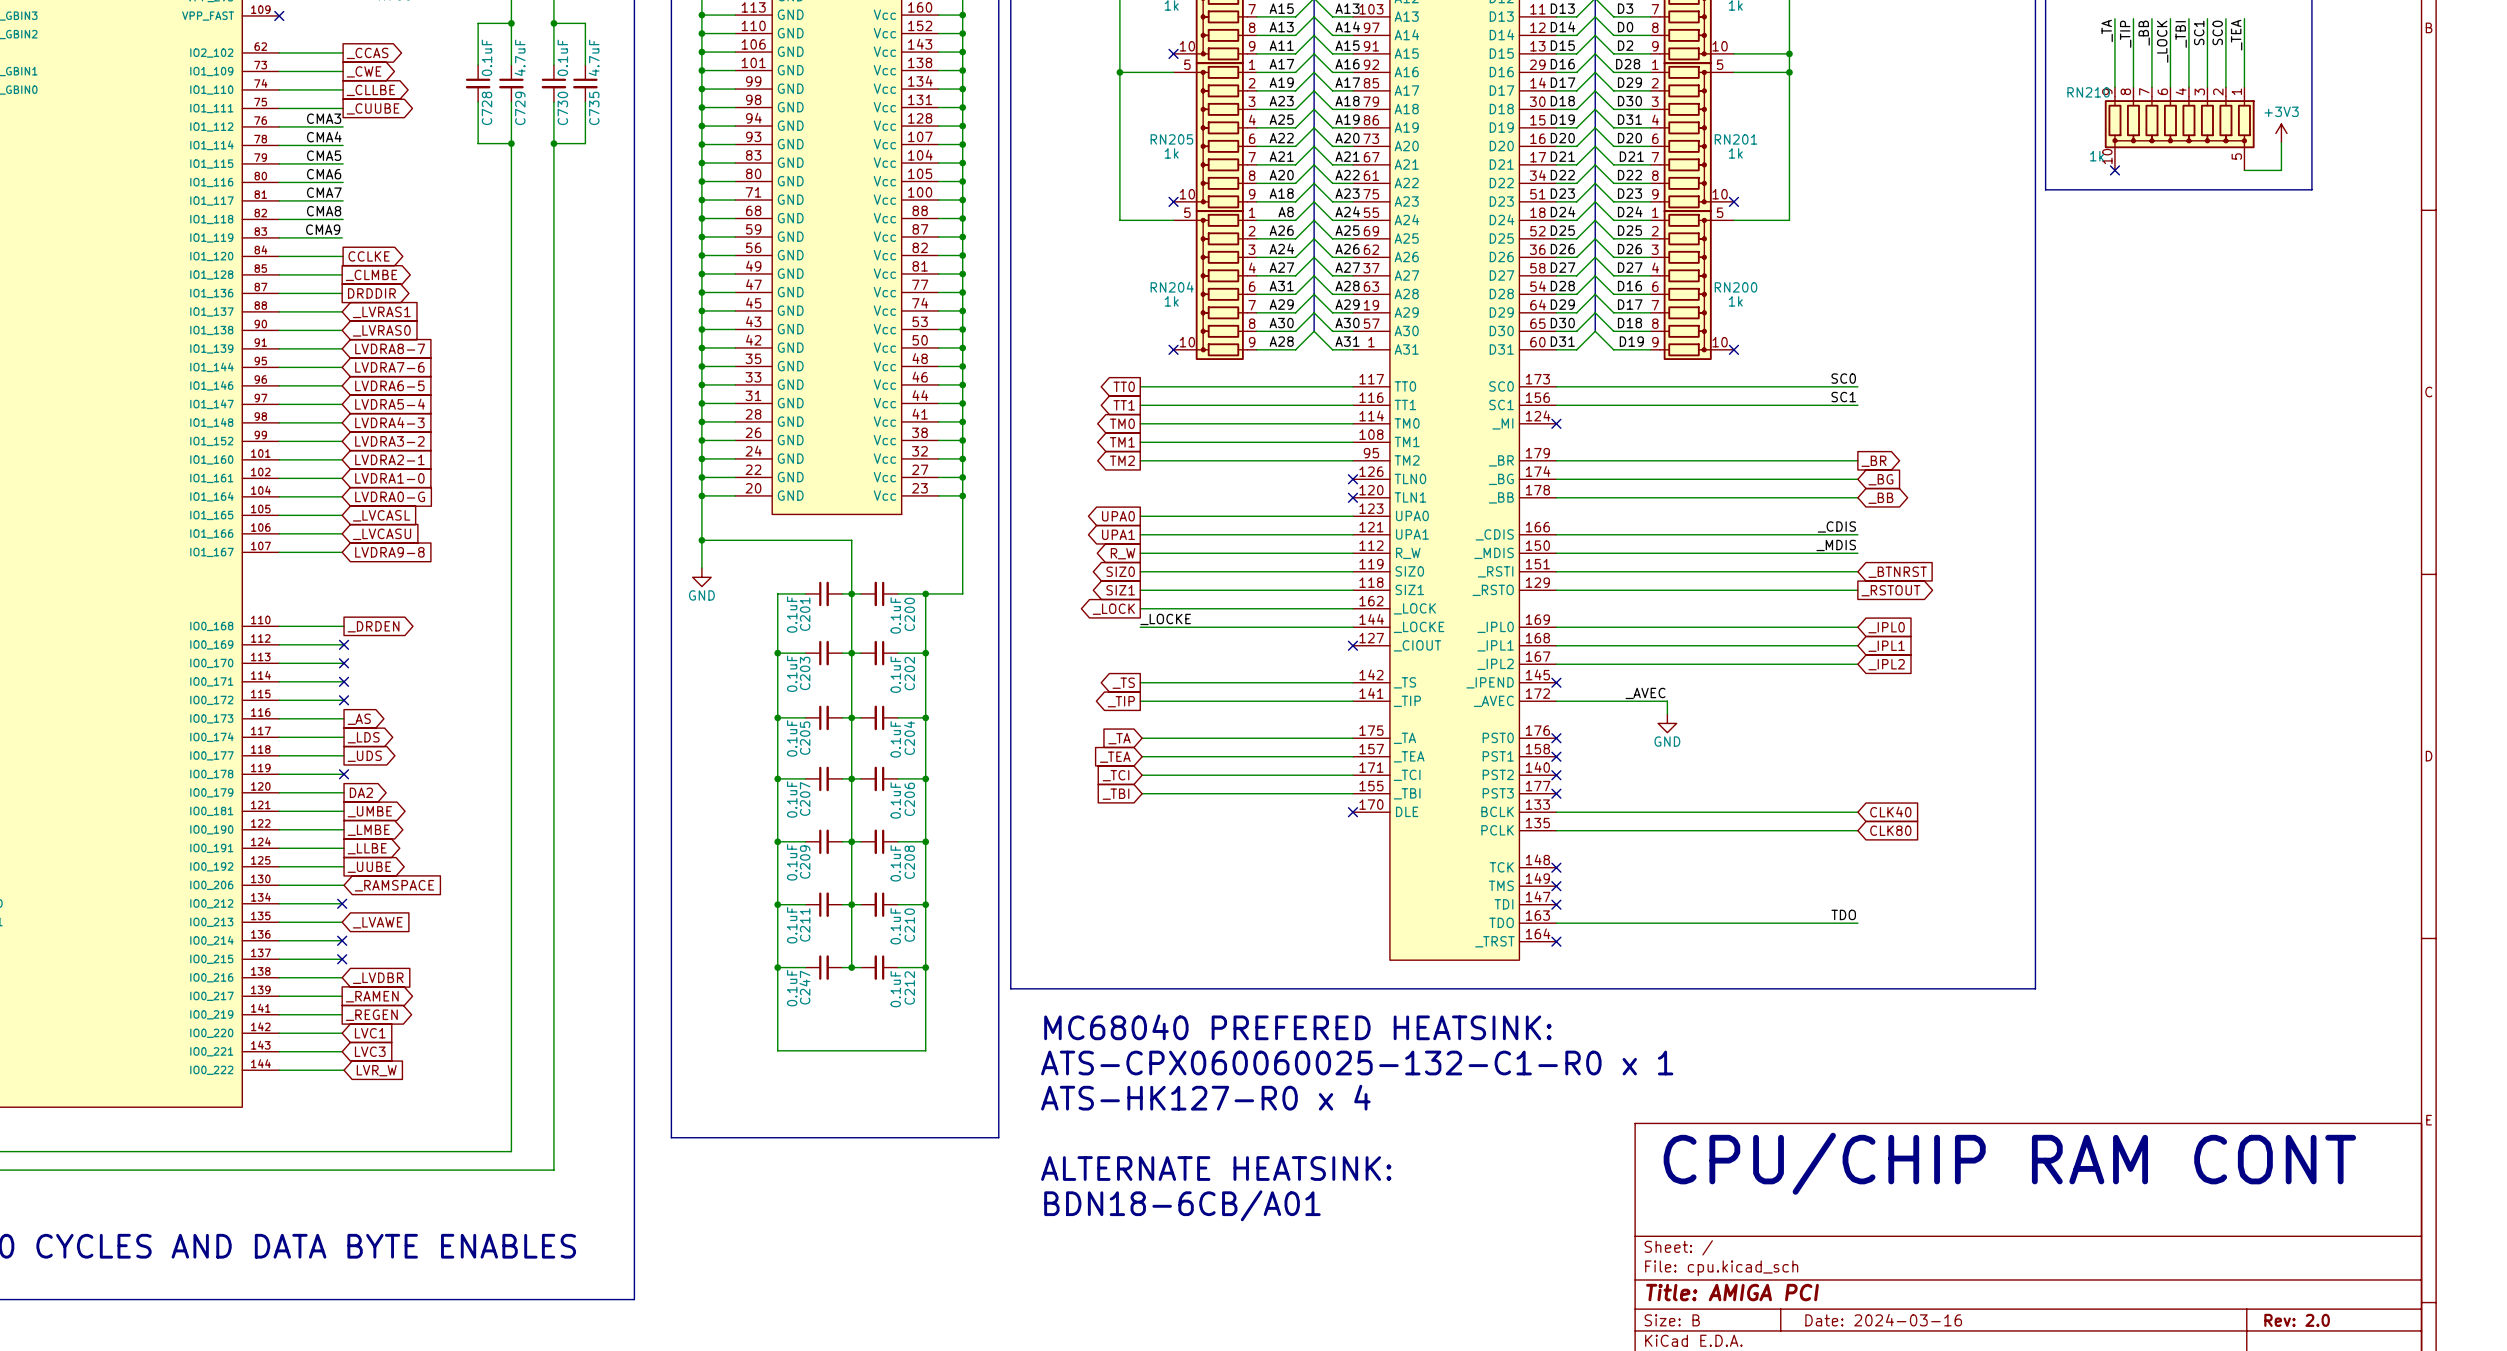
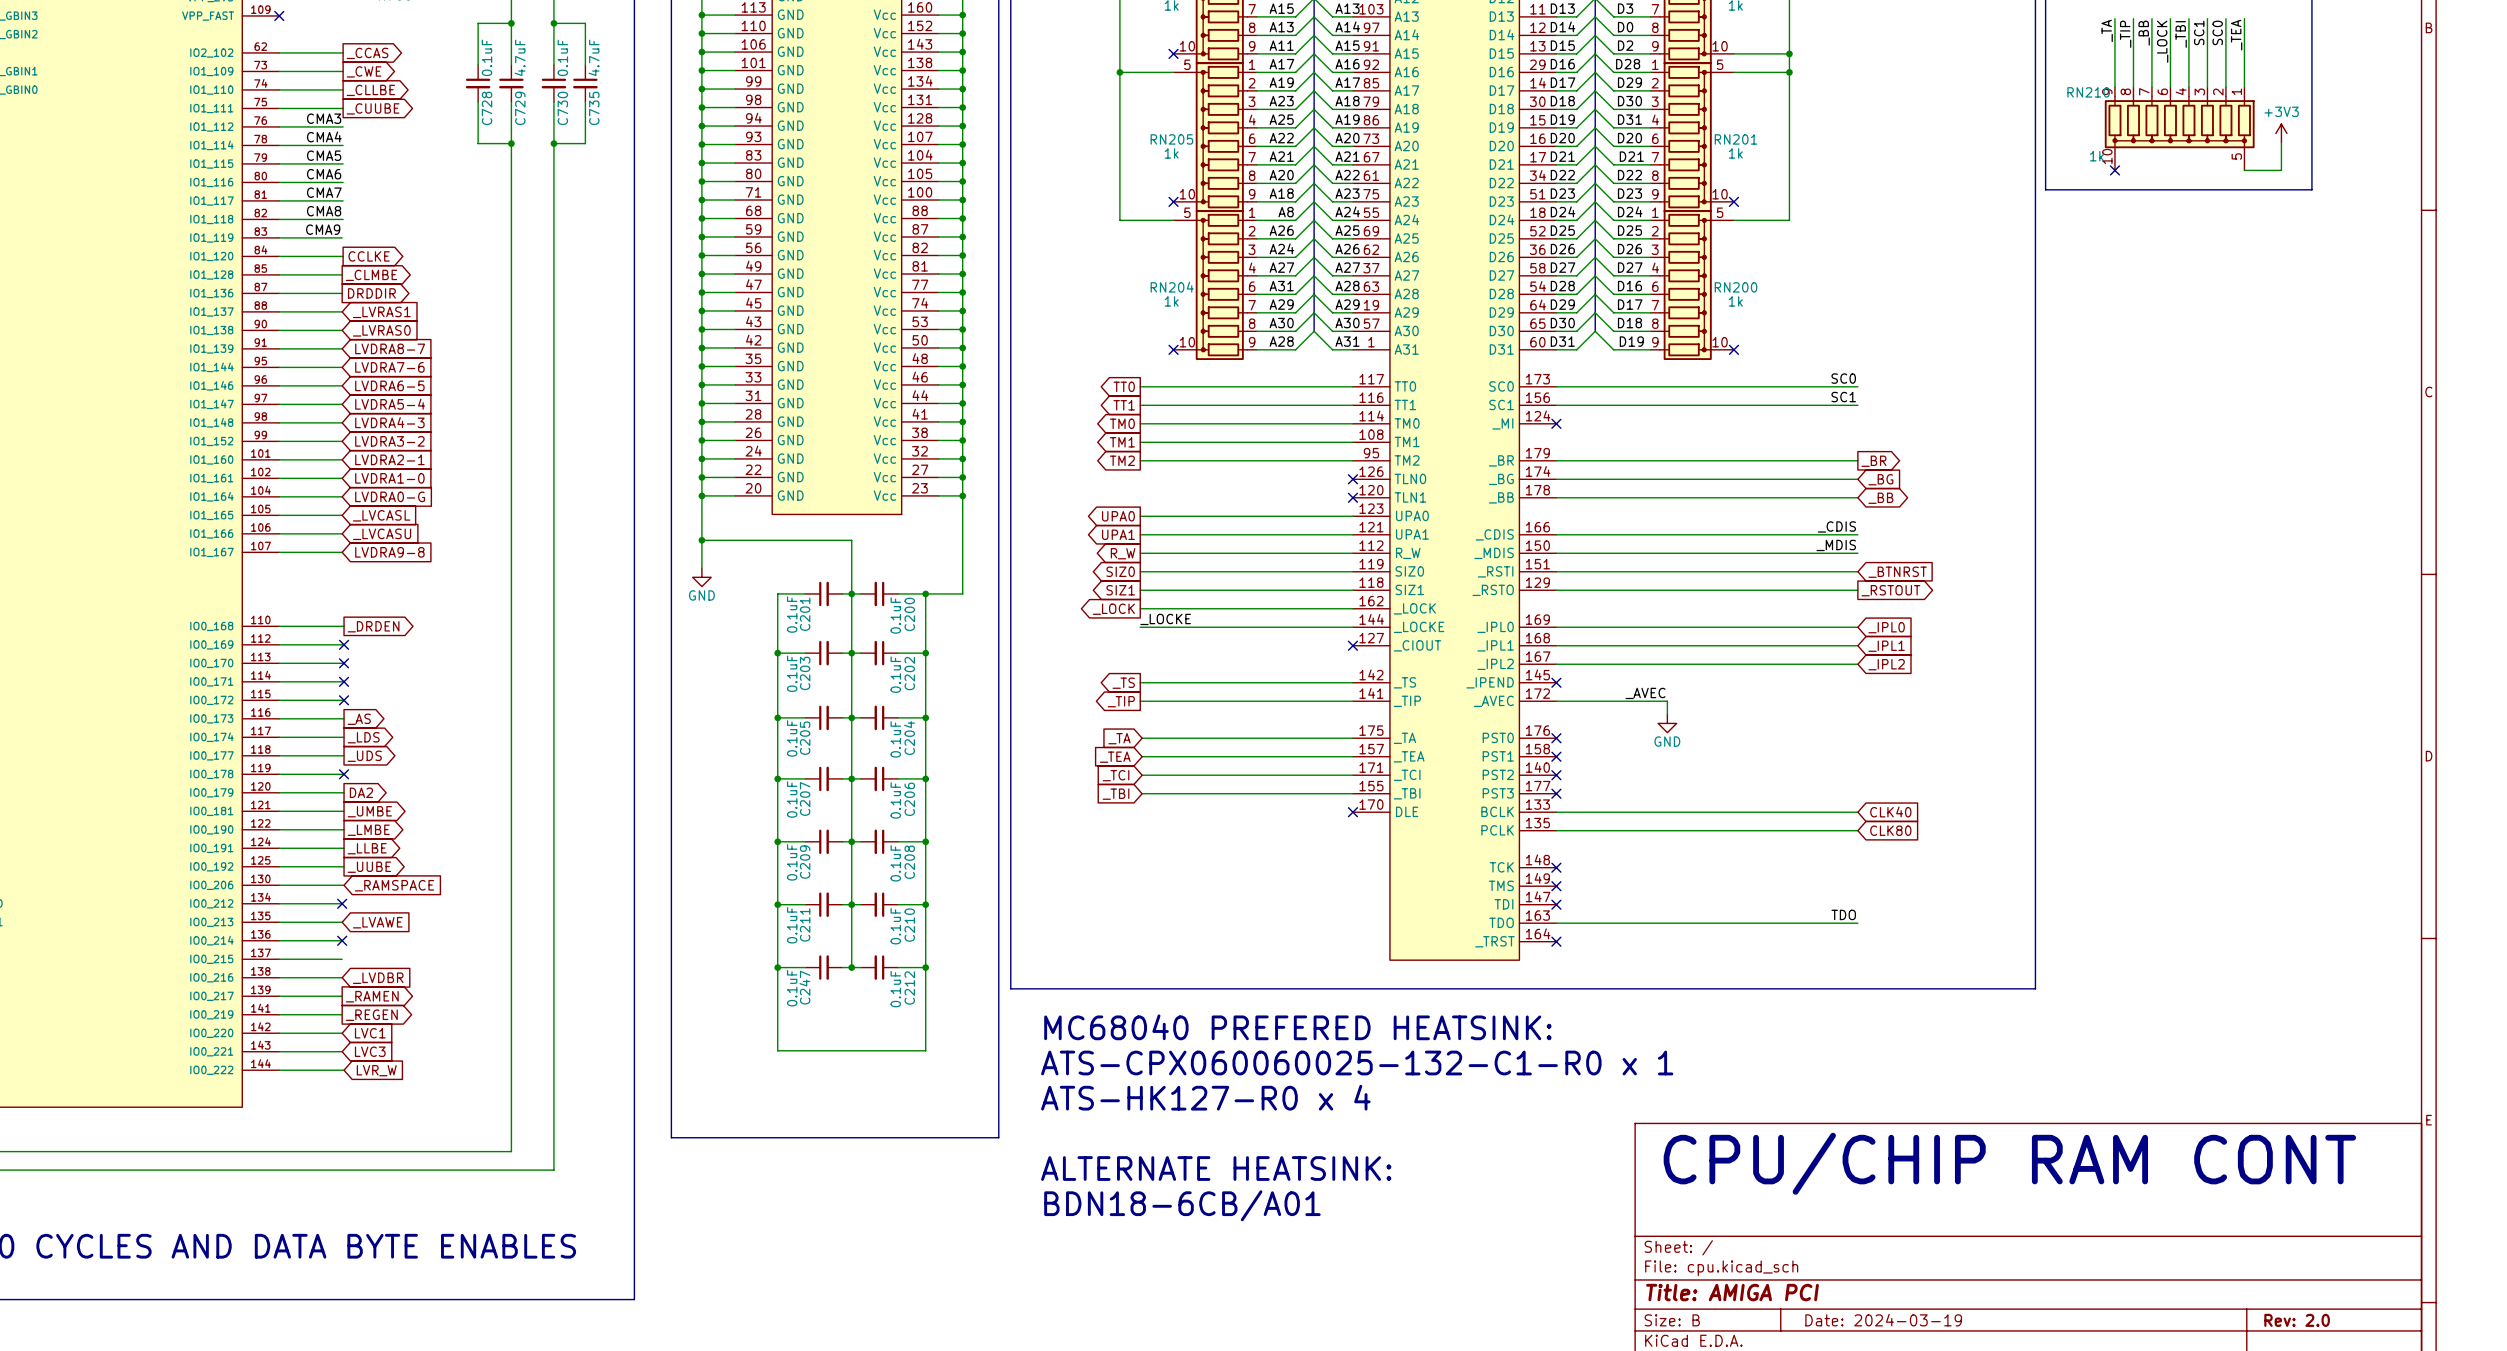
no-connect mark: (342, 959) -> none
title block: Date: 2024-03-16 (1883, 1320) -> Date: 2024-03-19 (1883, 1320)

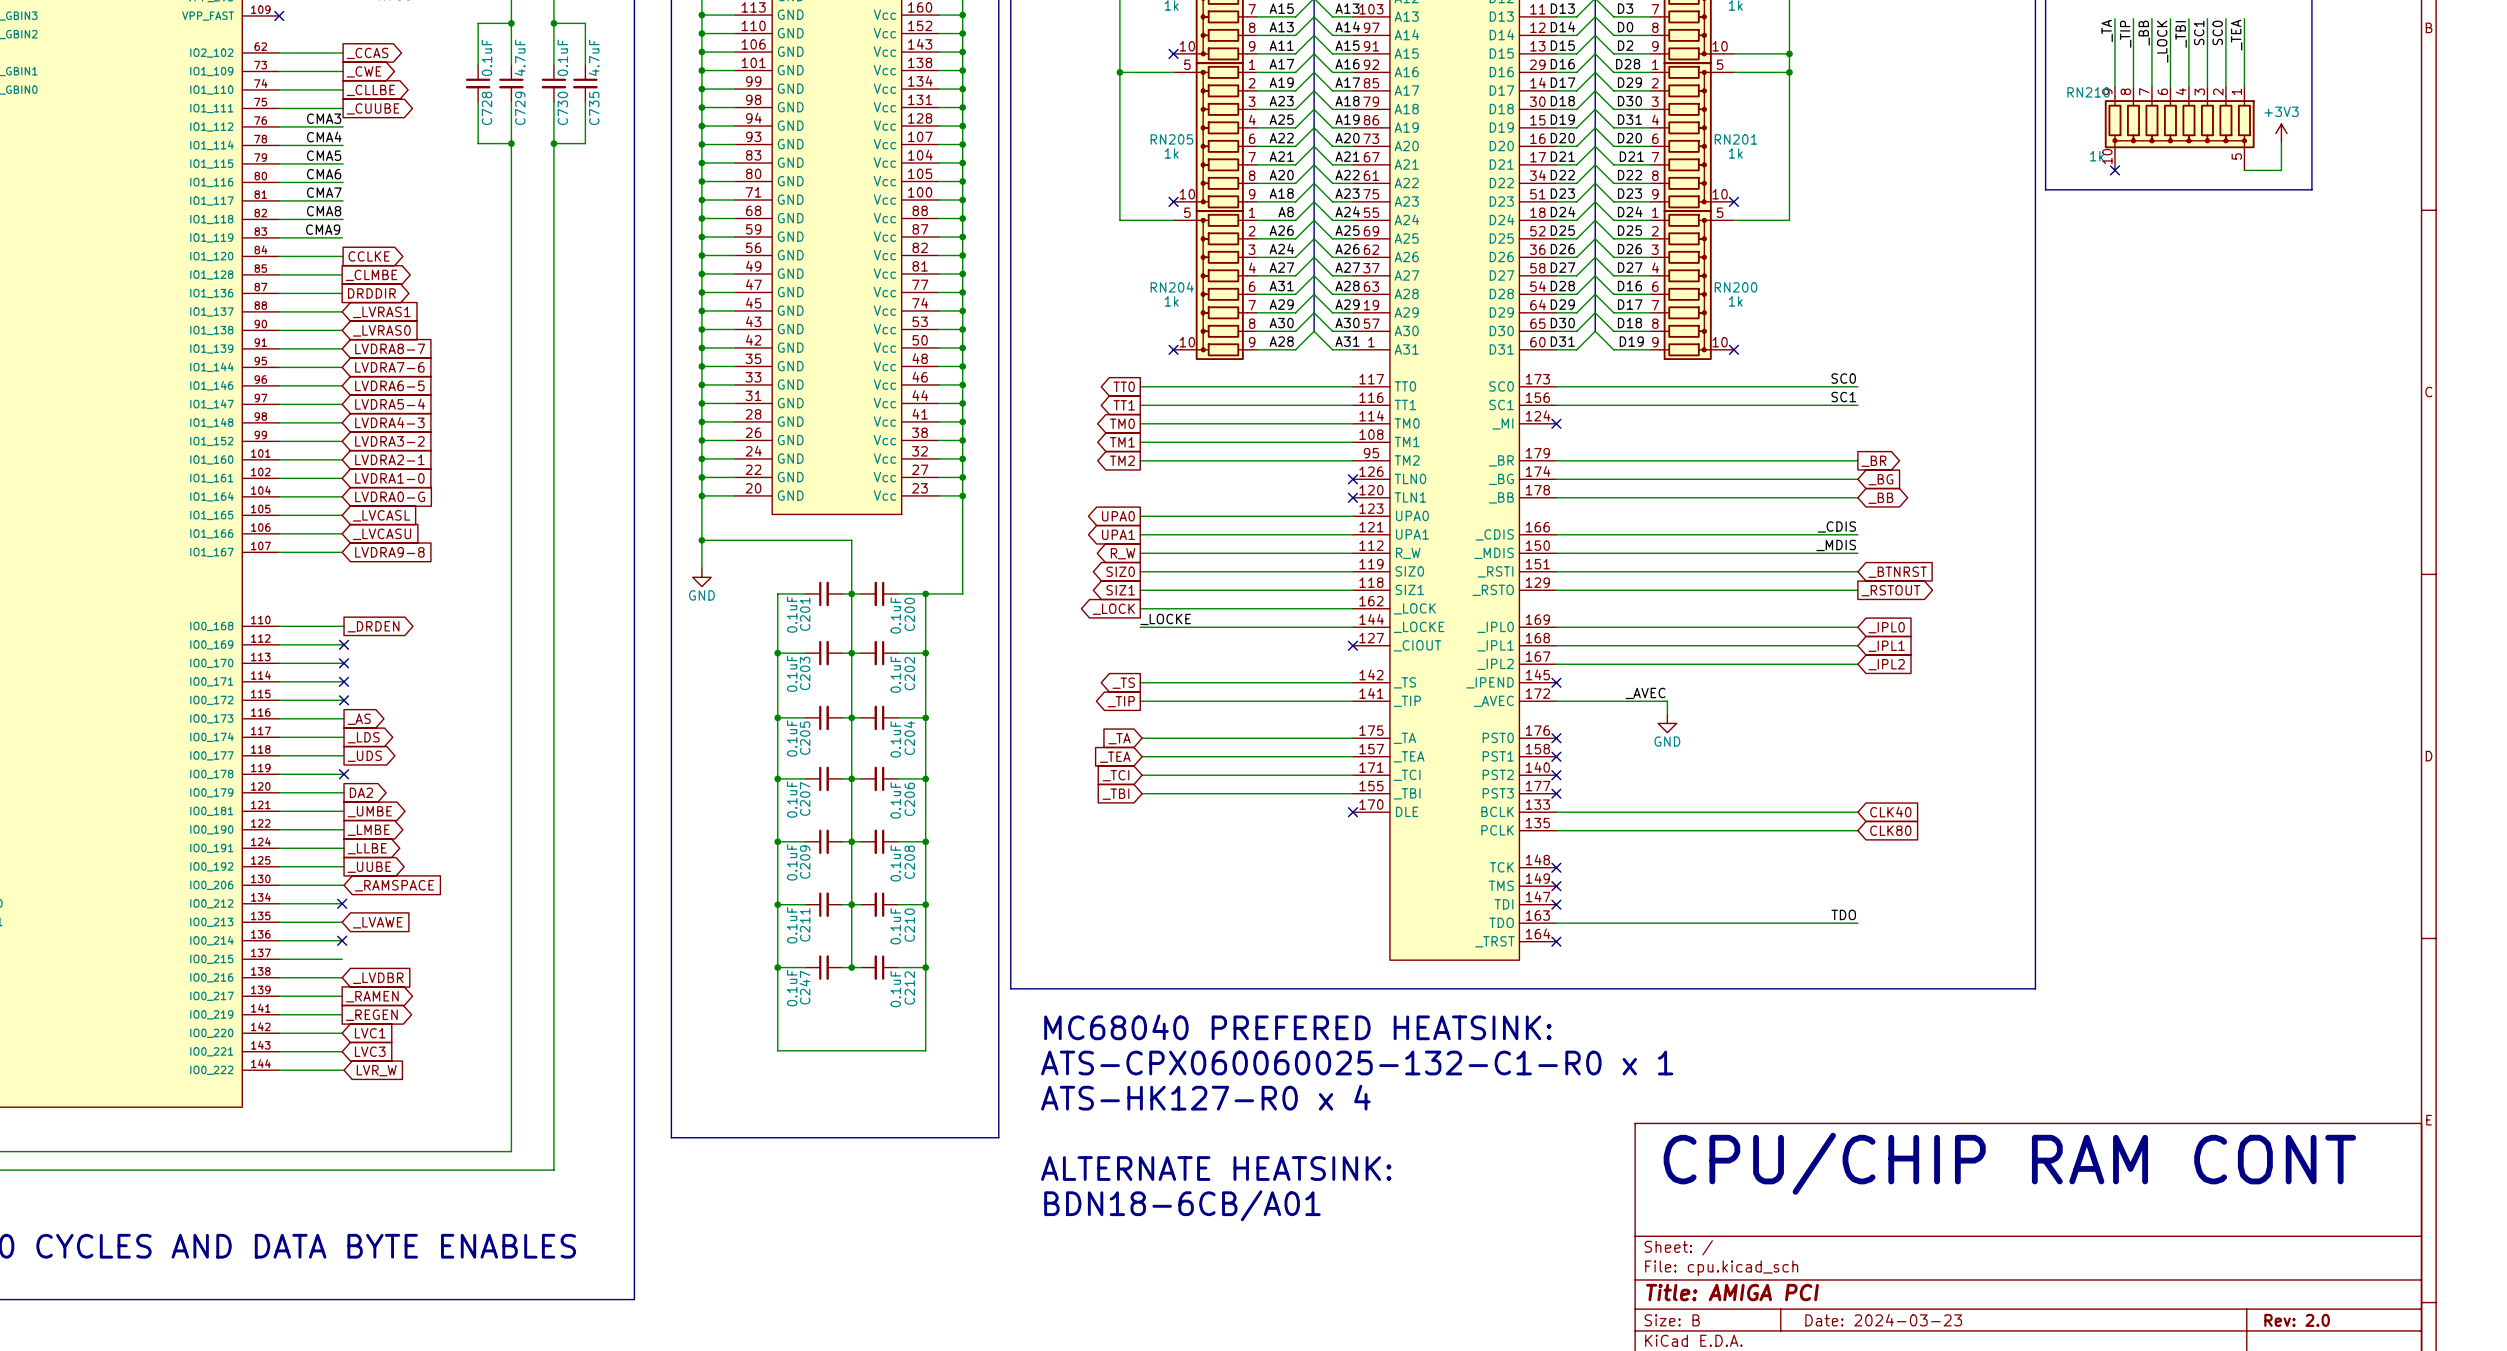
title block: Date: 2024-03-19 (1883, 1320) -> Date: 2024-03-23 (1883, 1320)

